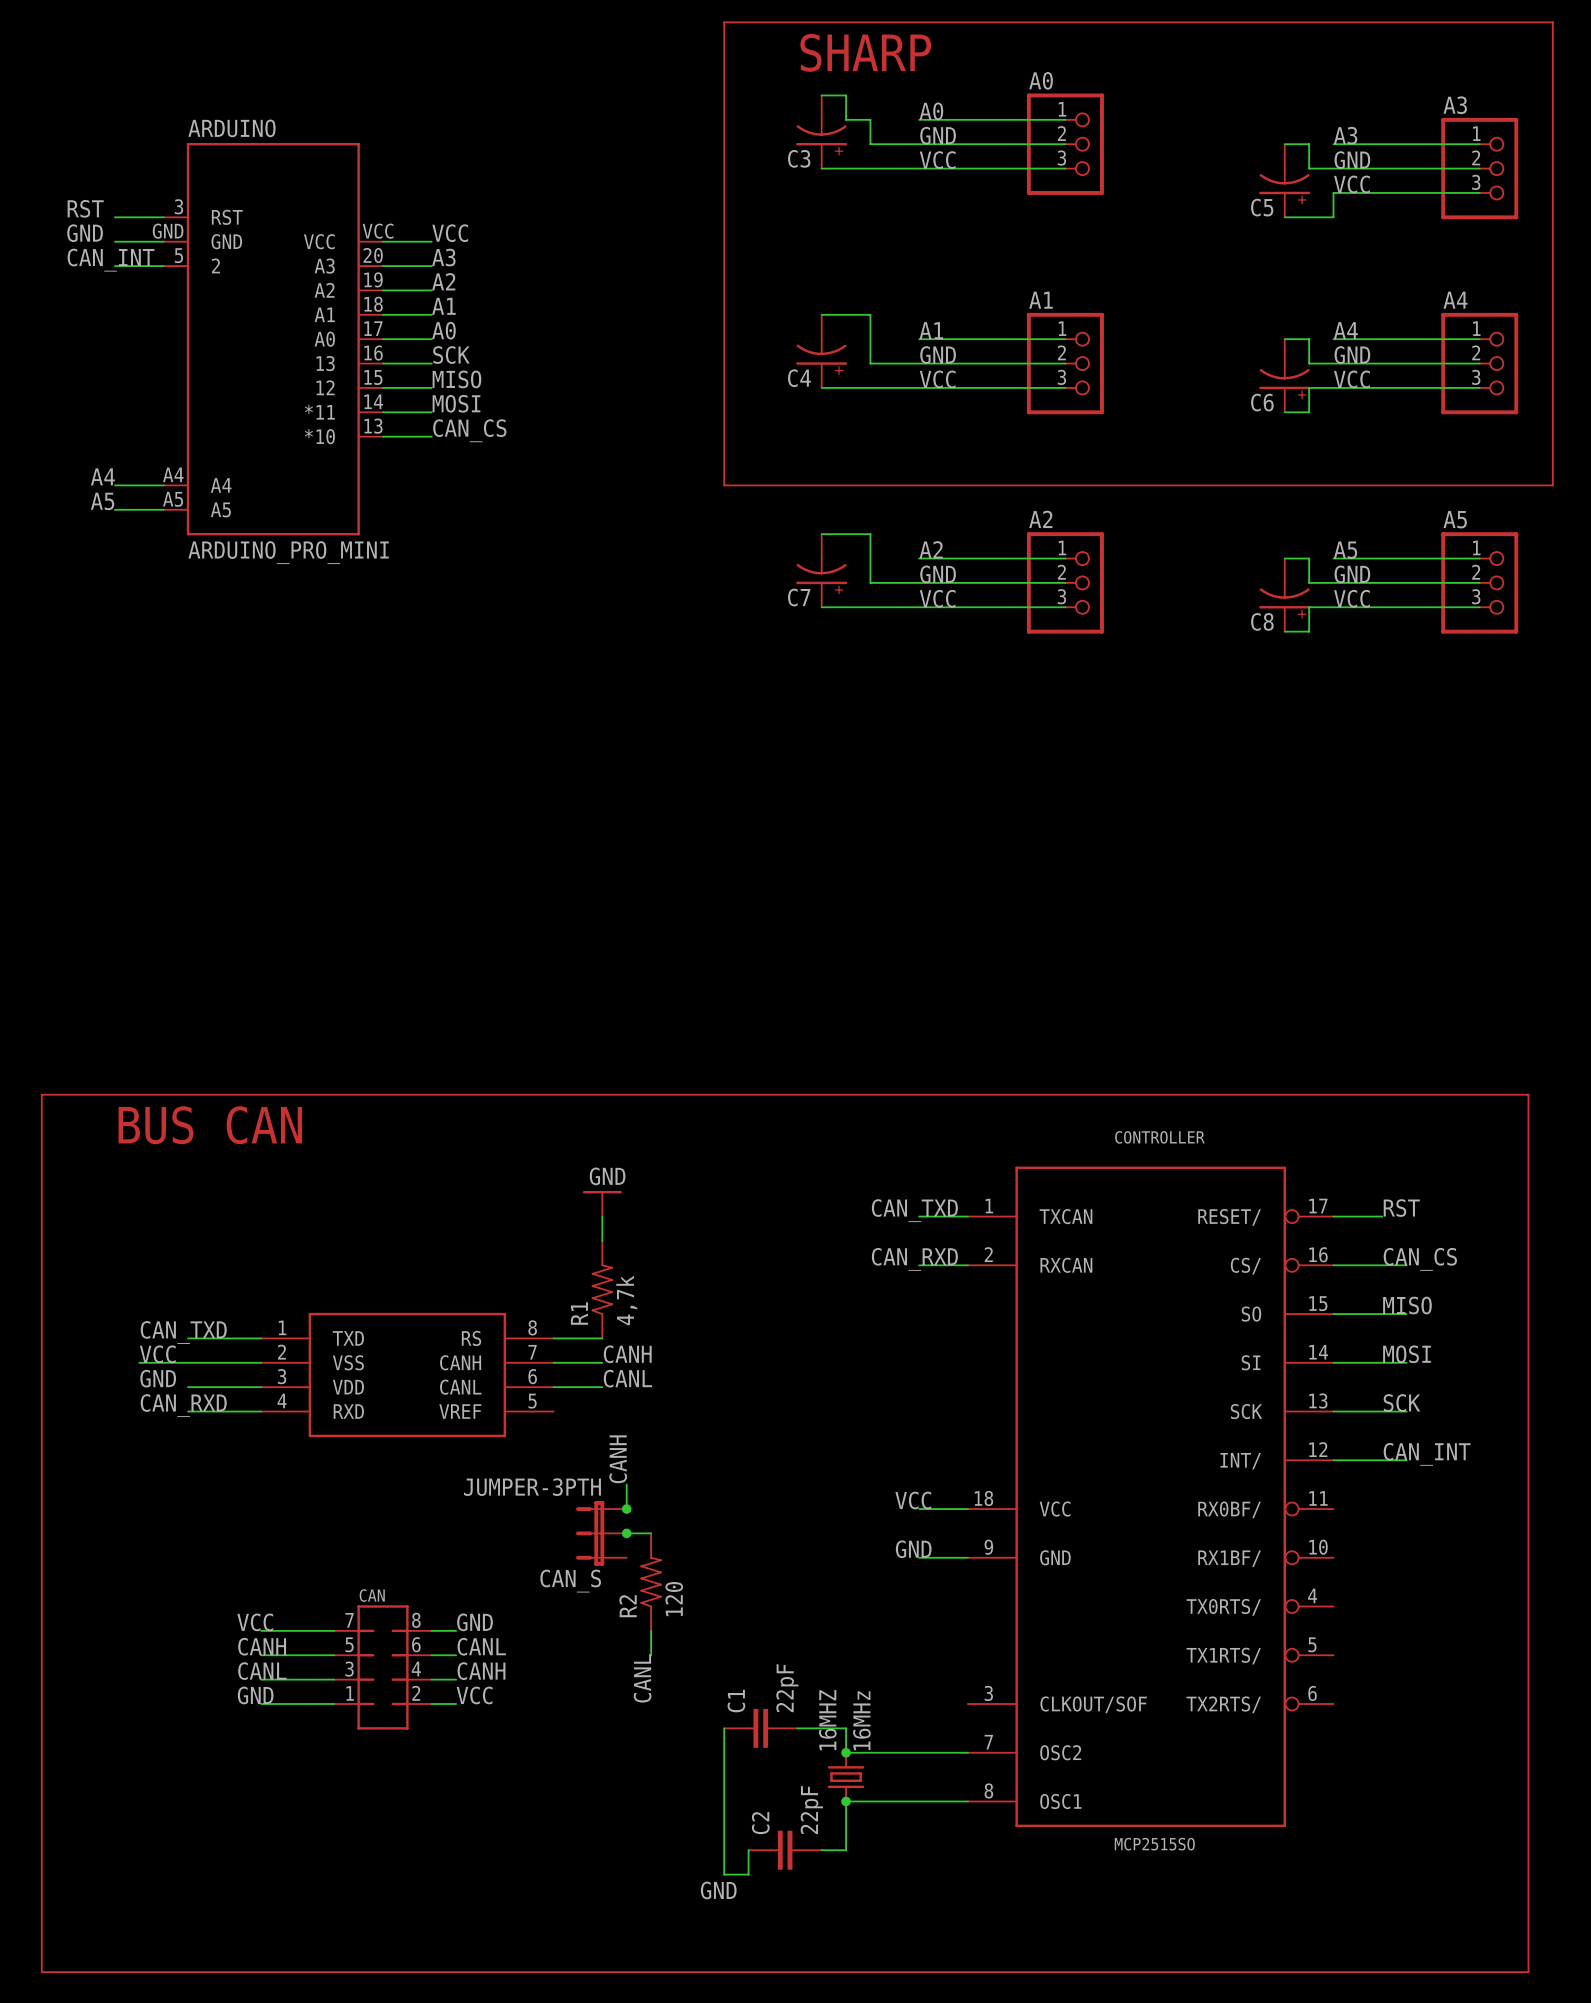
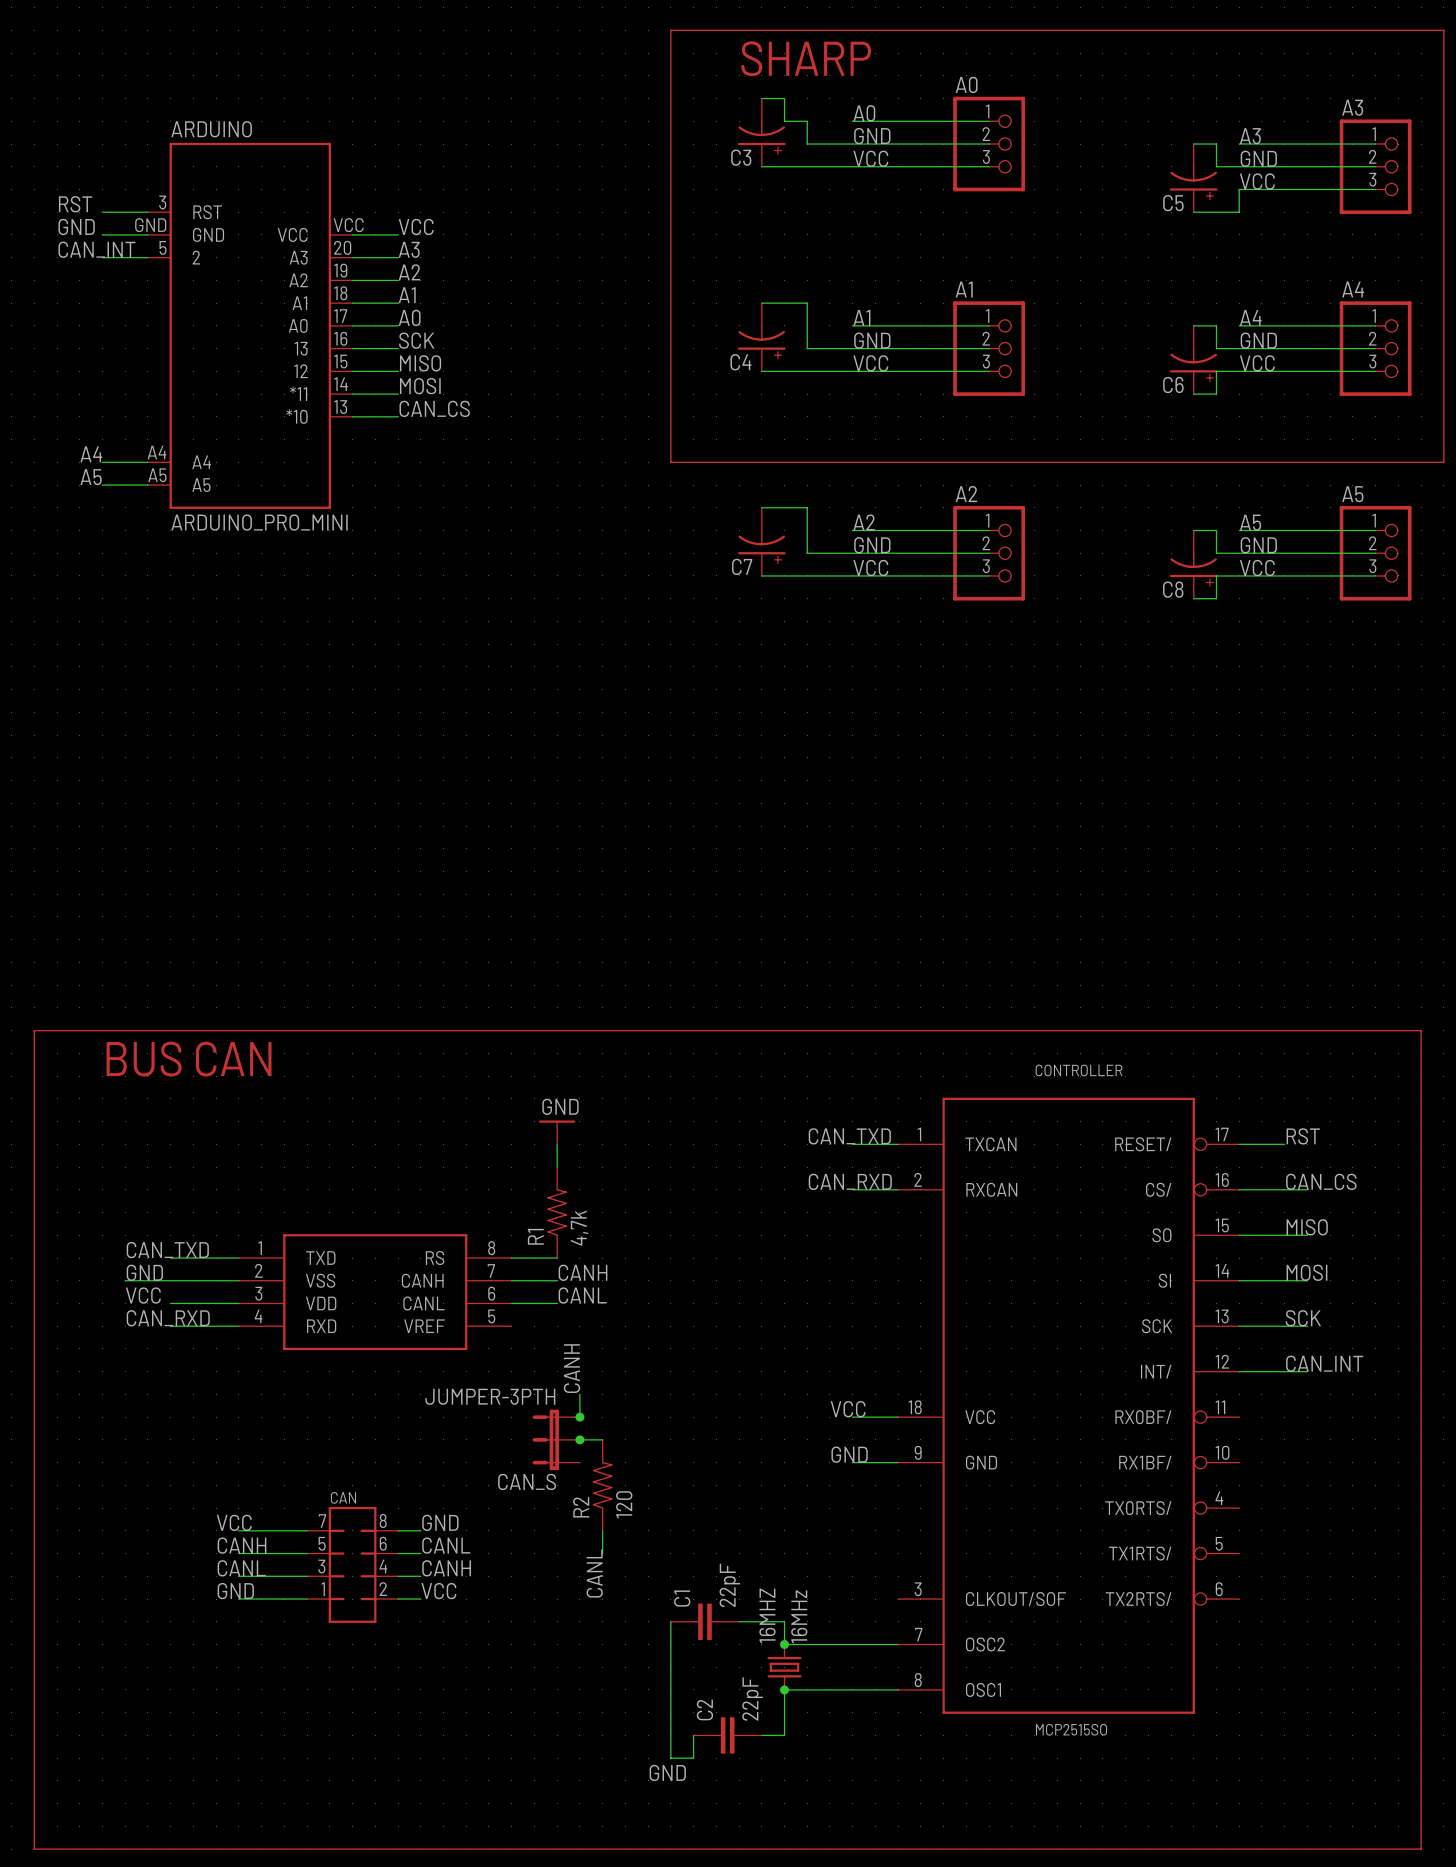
label: VCC (157, 1354) -> GND (144, 1272)
label: GND (158, 1378) -> VCC (143, 1295)

